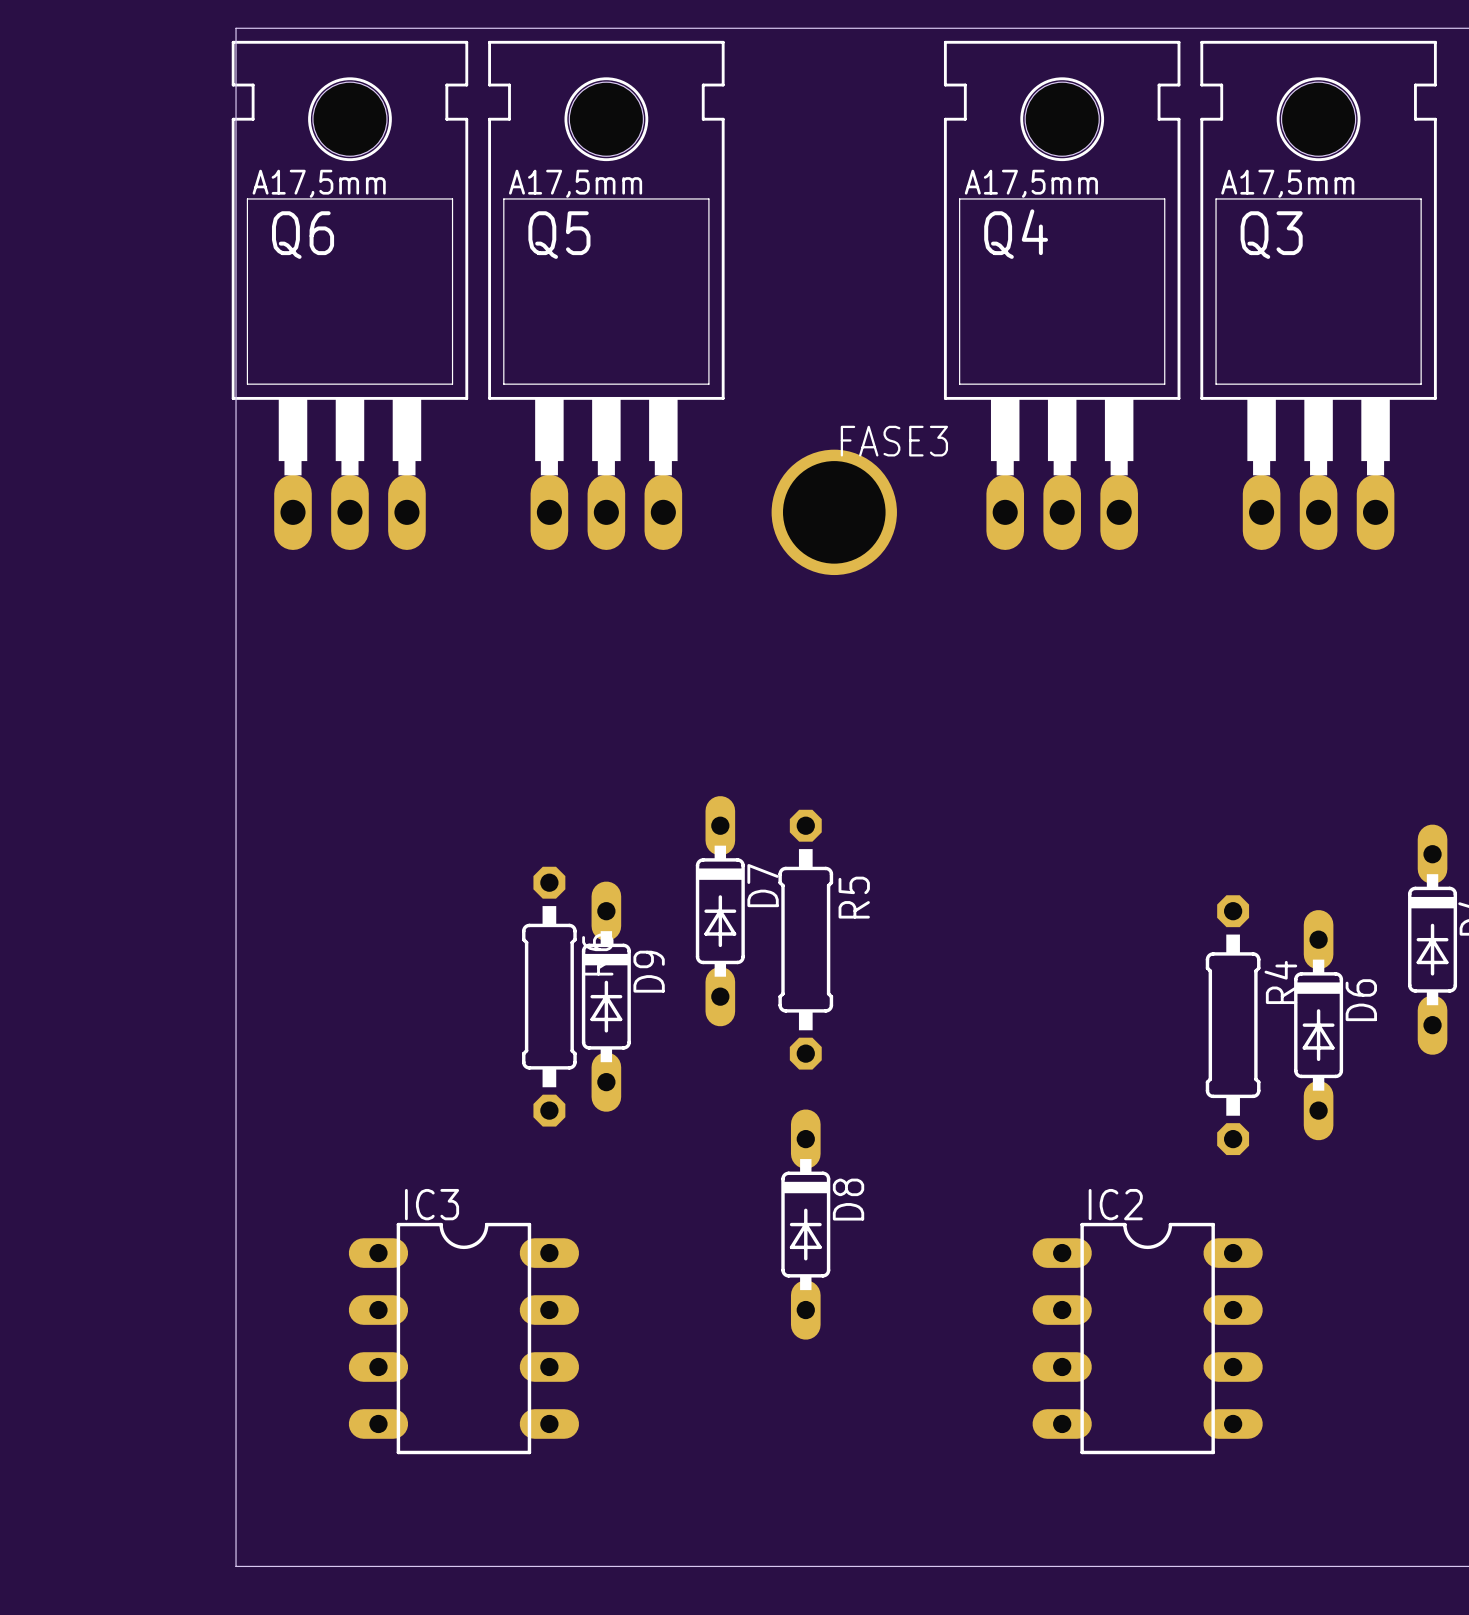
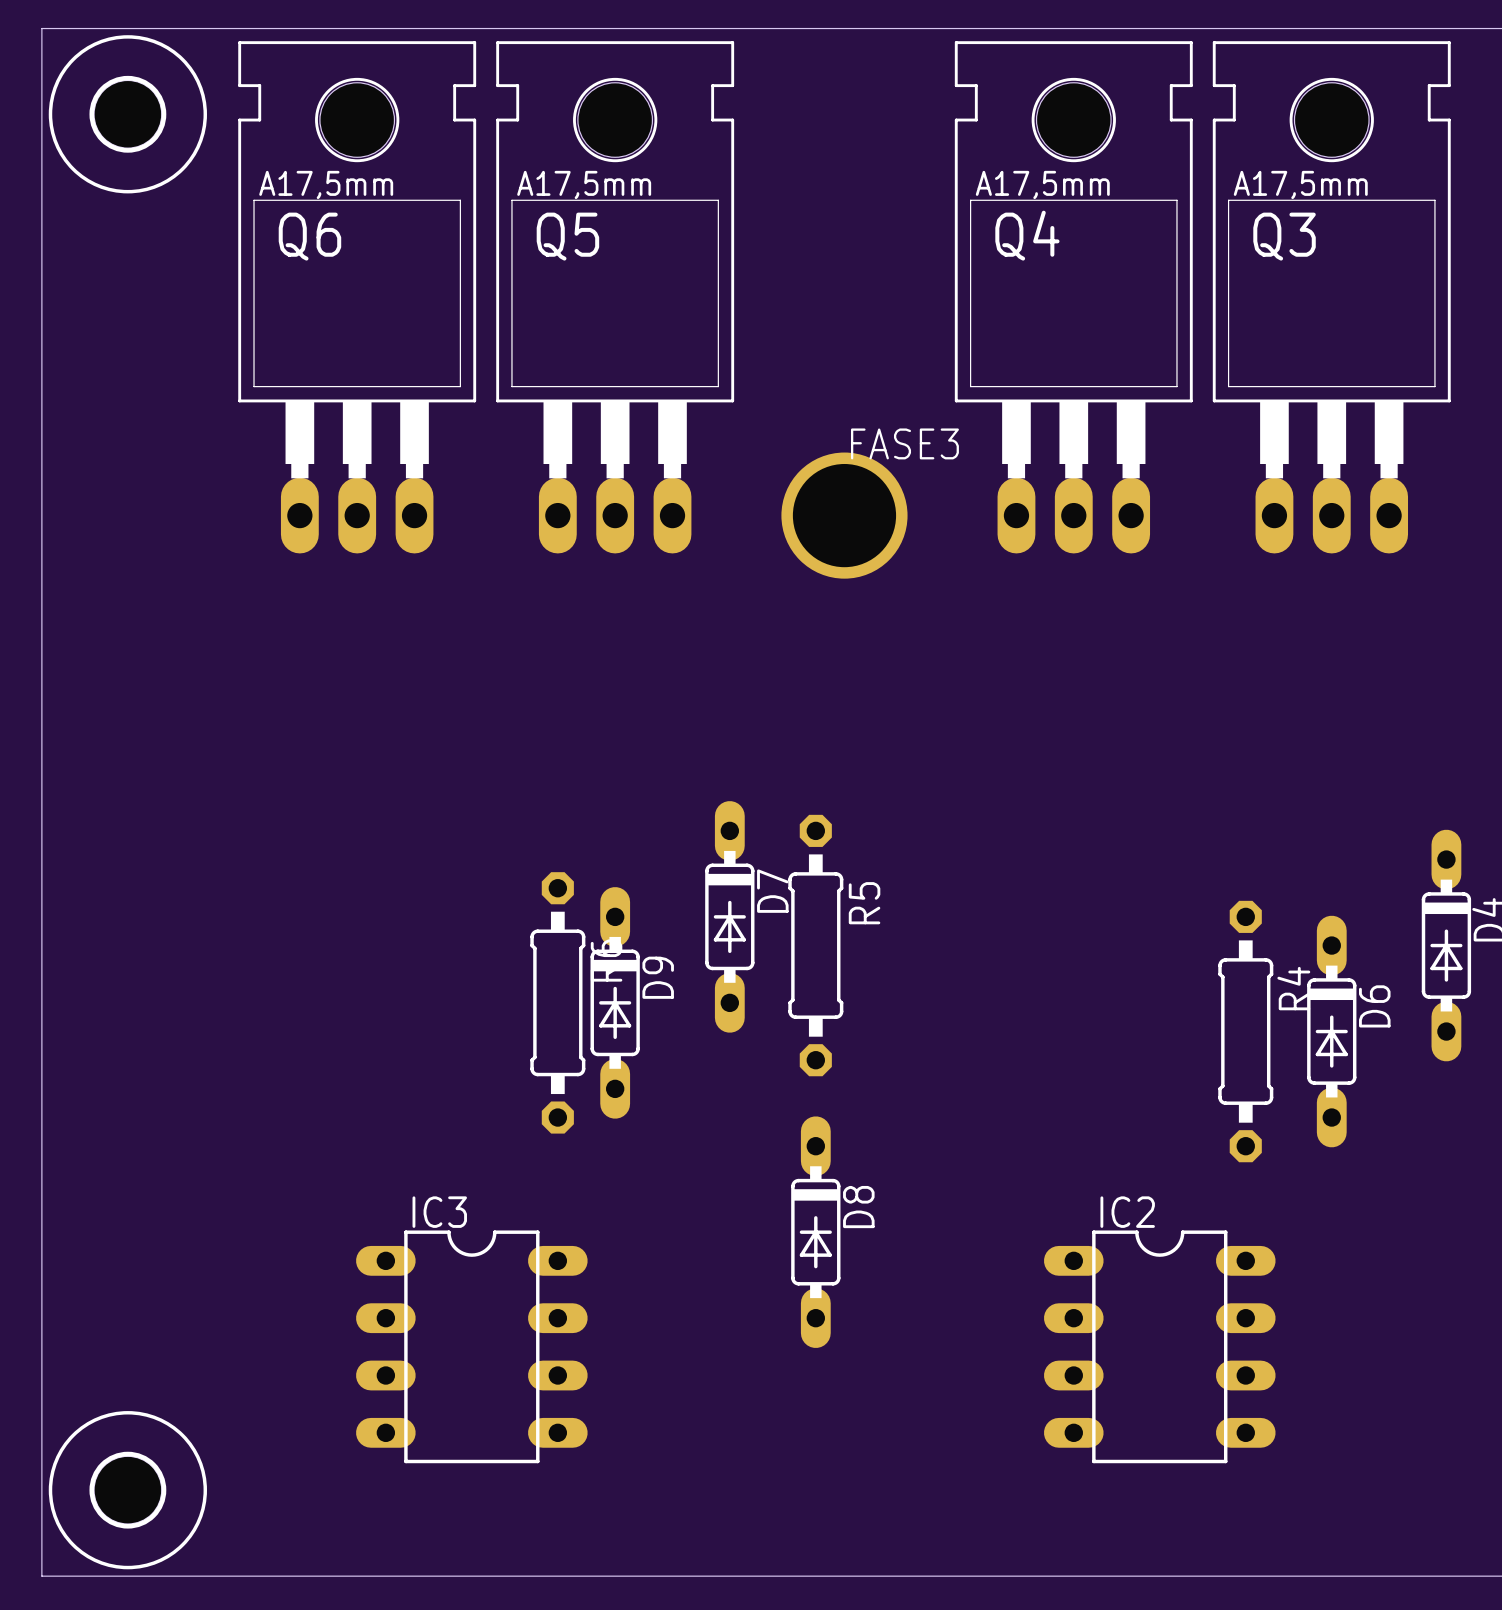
board edge: (236, 28) (236, 1566) -> (242, 28) (41, 28) (41, 1576) (242, 1576)
part: none -> (127, 114)
part: none -> (127, 1490)

